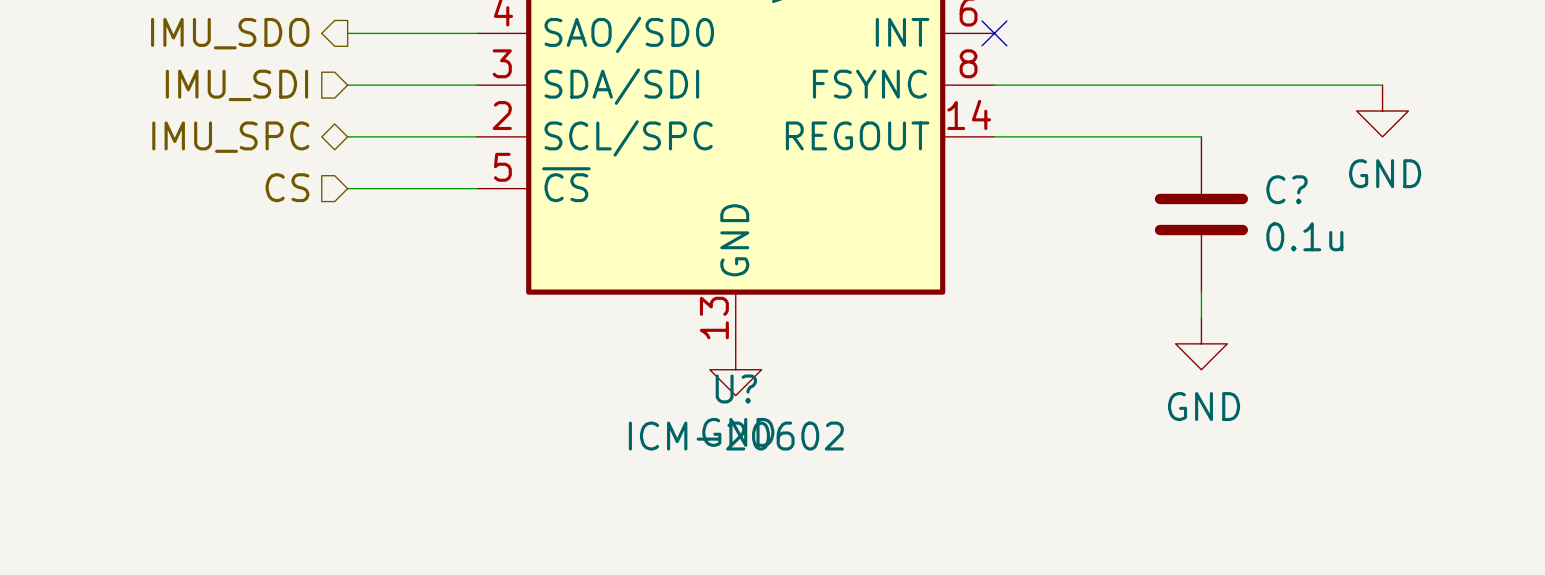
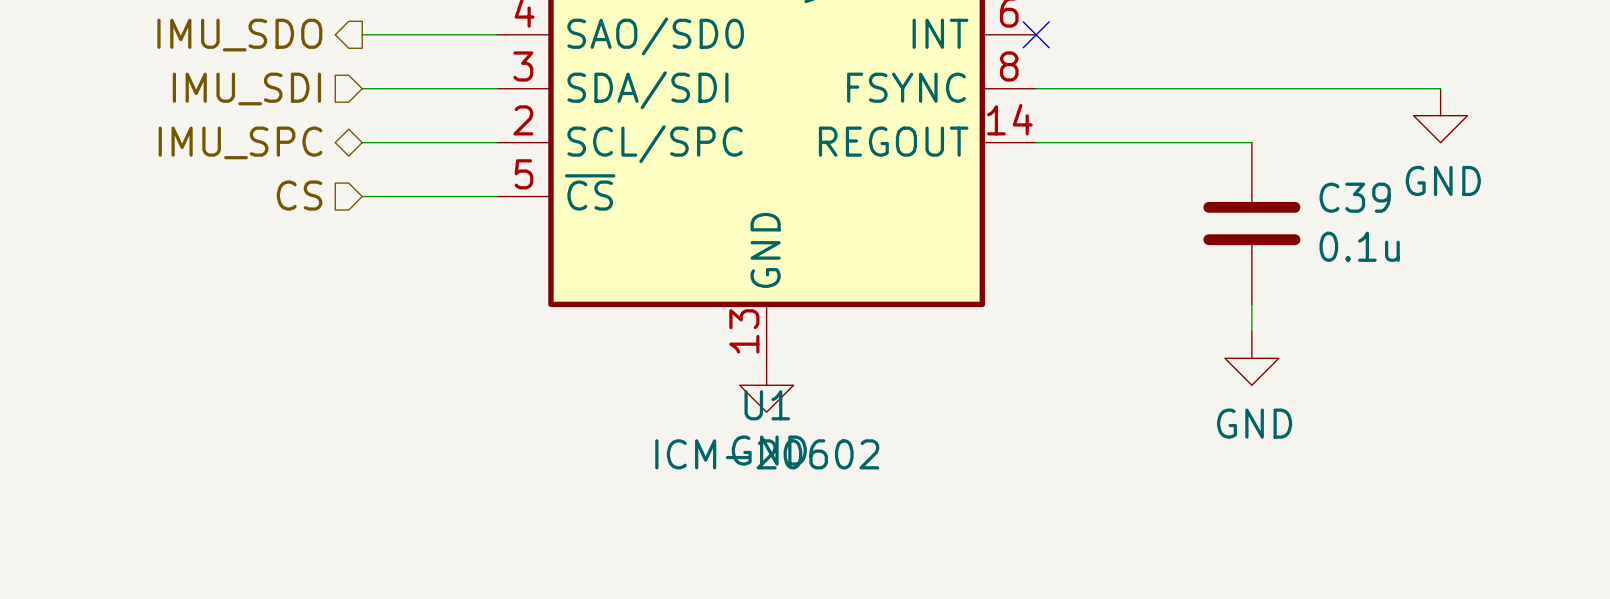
C? name: C? (1287, 189) -> C39 (1355, 197)
U? name: U? (736, 388) -> U1 (767, 405)

